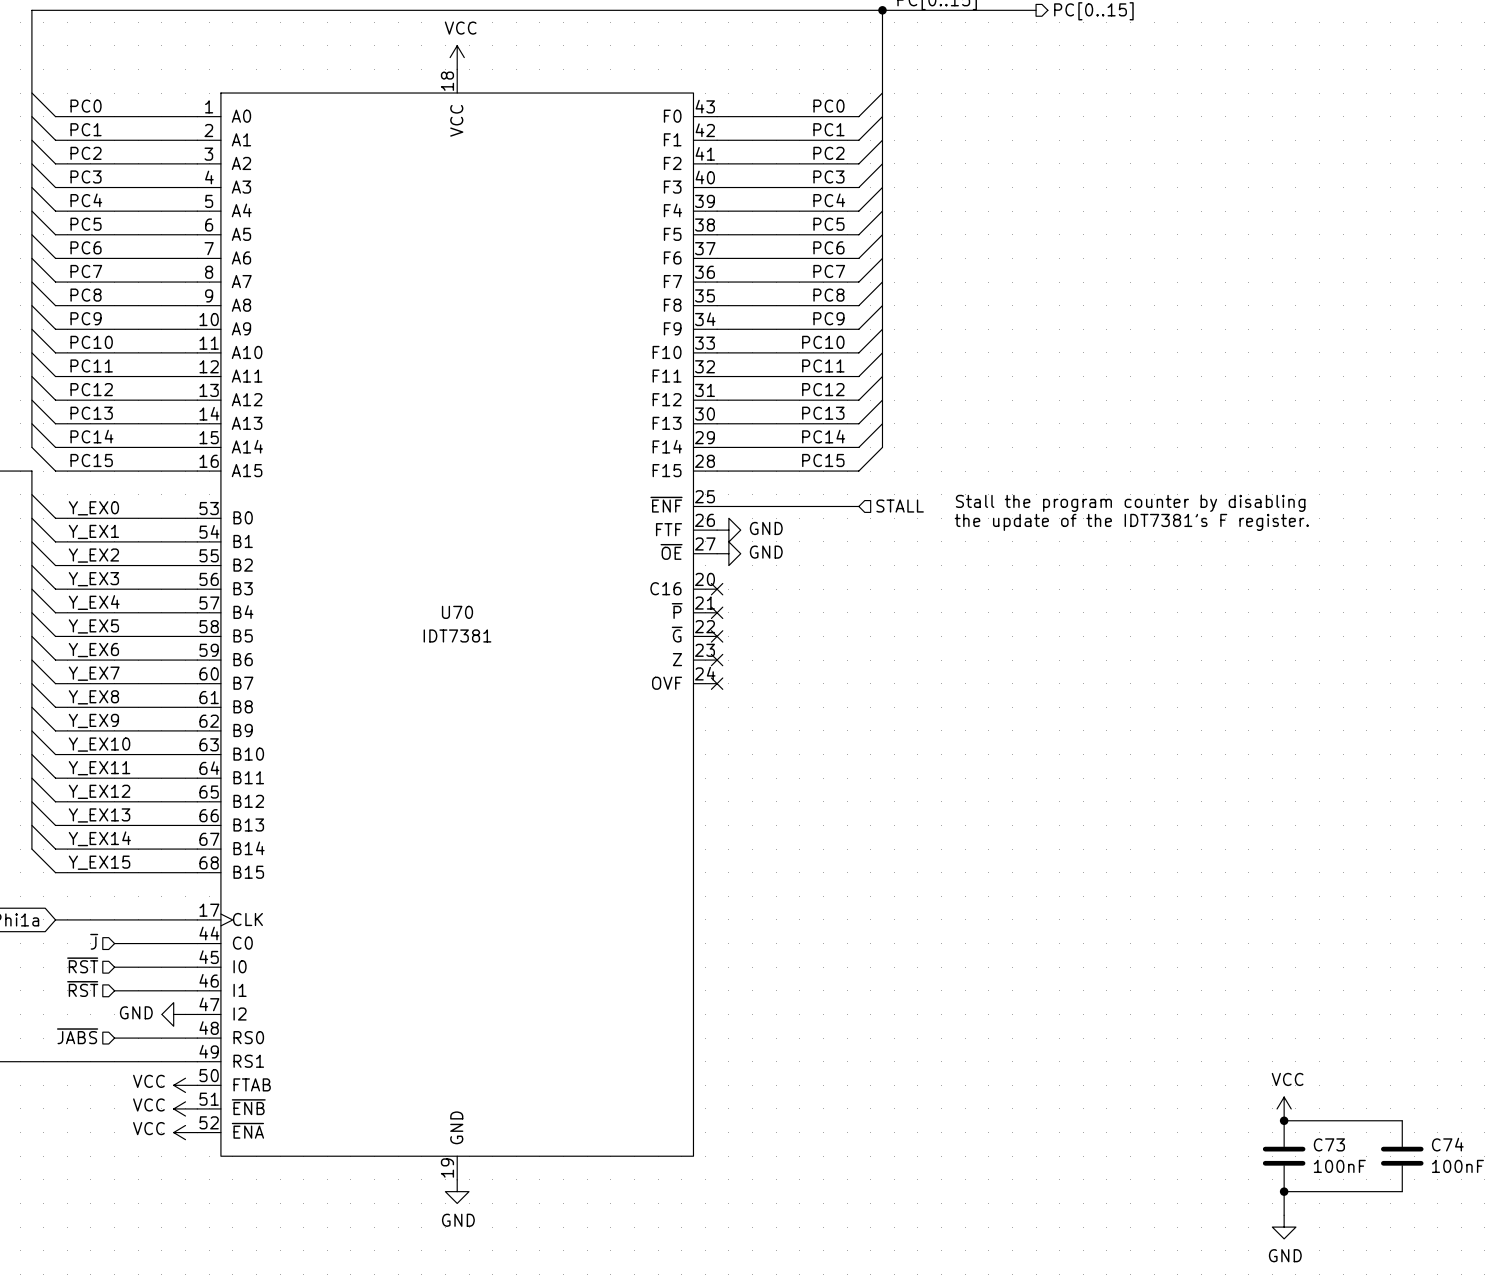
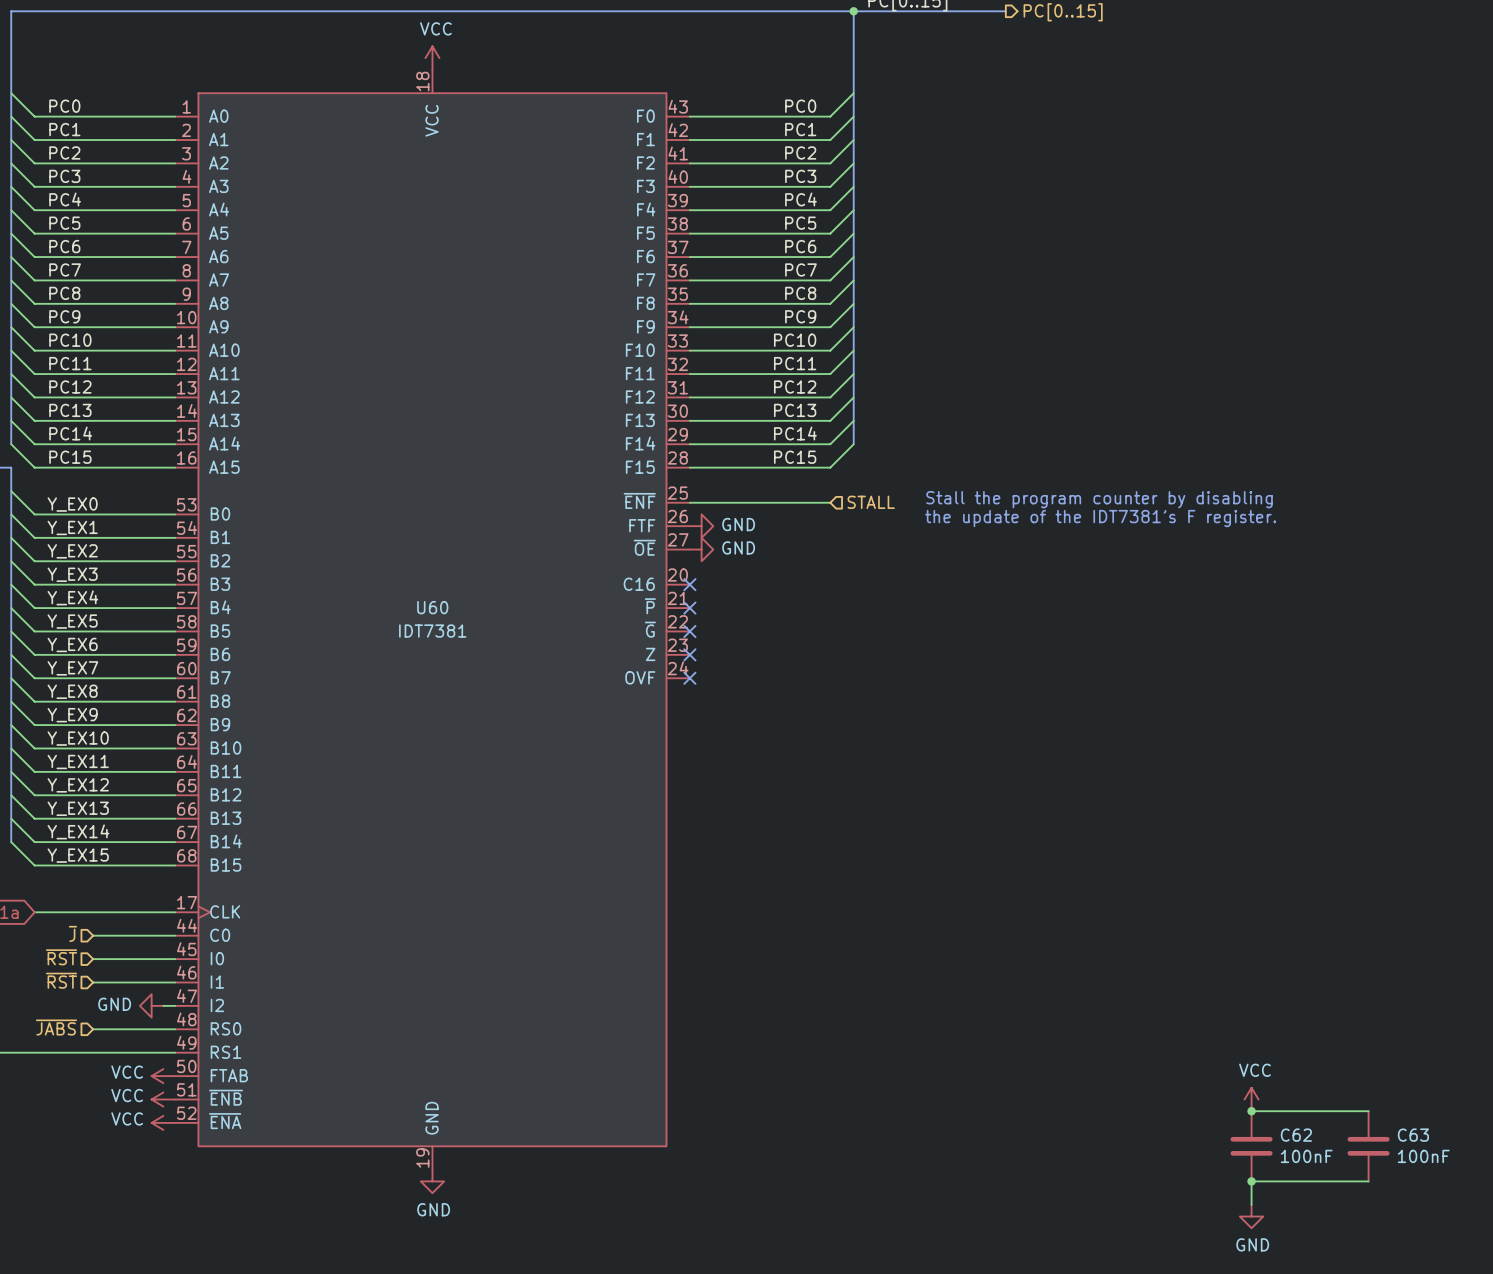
U70 name: U70 (457, 612) -> U60 (432, 607)
C73 name: C73 (1329, 1144) -> C62 (1296, 1135)
C74 name: C74 (1447, 1144) -> C63 (1413, 1135)

